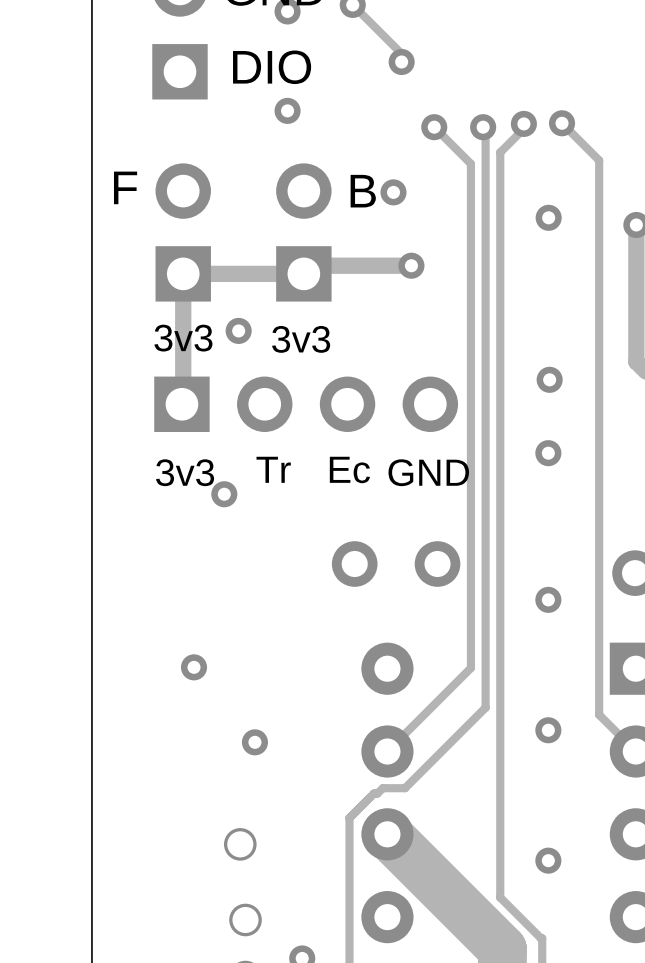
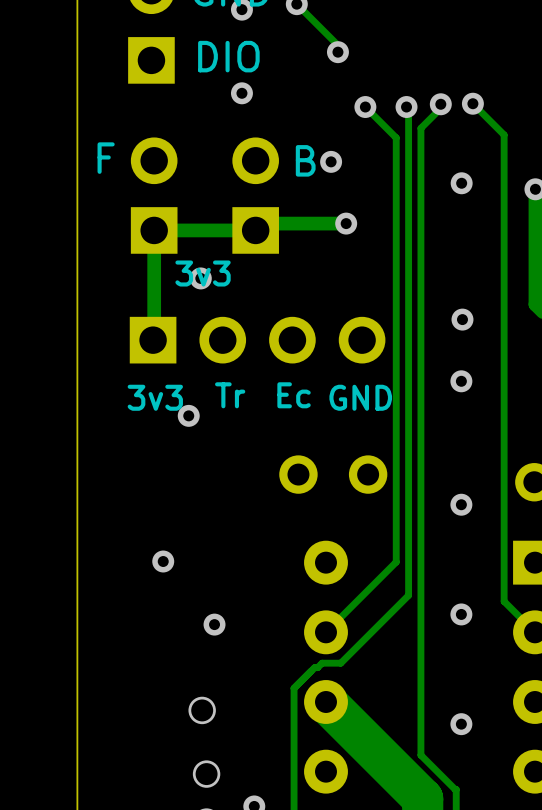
text: none -> 3v3 (203, 273)
text: 3v3 (183, 338) -> none
text: 3v3 (301, 339) -> none

